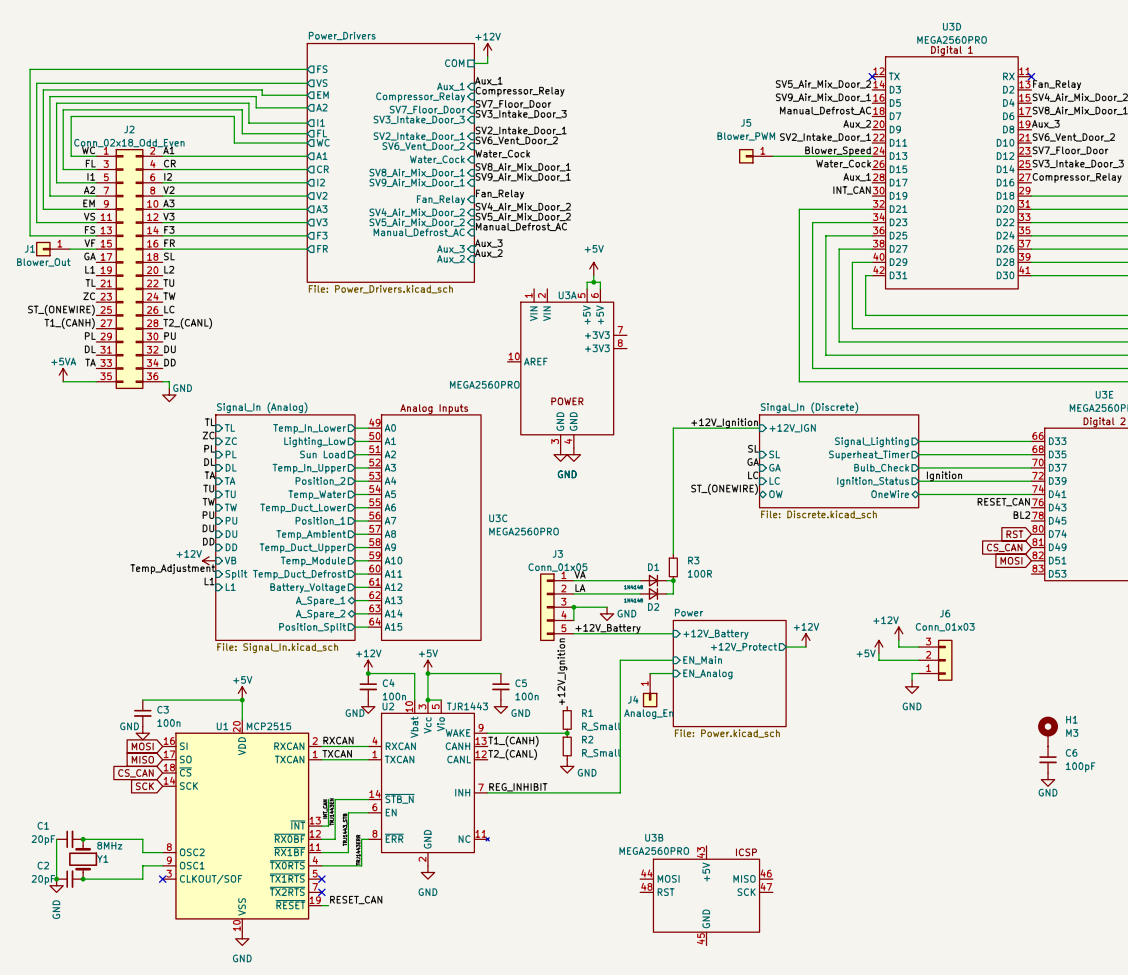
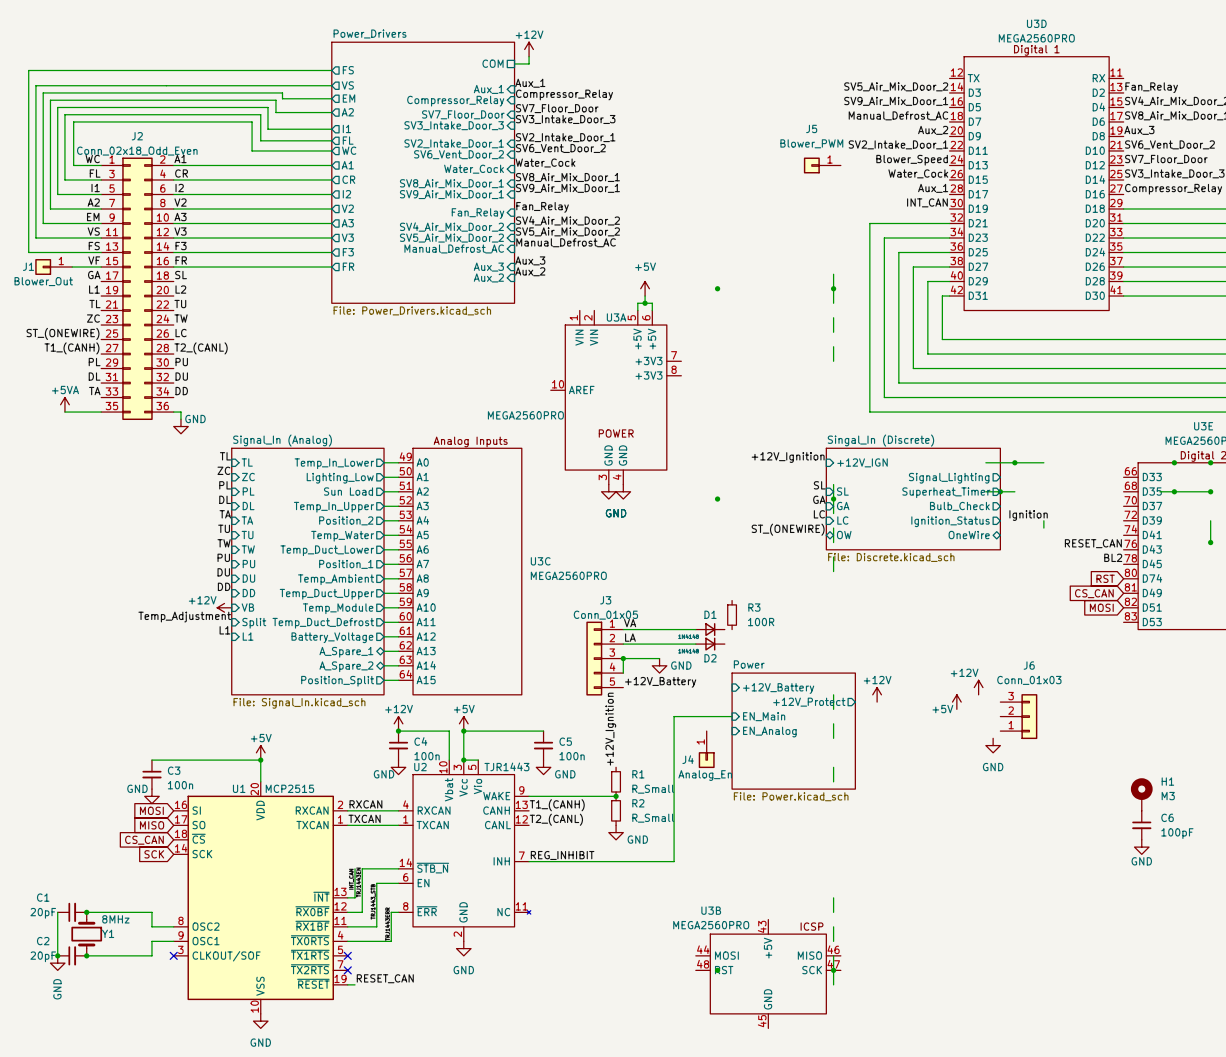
no-connect mark: (872, 76) -> none
no-connect mark: (1031, 76) -> none
wire: (772, 156) (872, 156) -> none
wire: none -> (833, 274) (833, 303)
junction: none -> (717, 288)
junction: none -> (833, 288)
wire: none -> (833, 317) (833, 332)
wire: none -> (833, 346) (833, 361)
wire: (759, 428) (673, 428) (673, 554) -> none
wire: none -> (985, 462) (1043, 462)
junction: none -> (1014, 462)
junction: none -> (1174, 462)
junction: none -> (1210, 462)
wire: (918, 441) (1031, 441) -> none
wire: none -> (833, 484) (833, 513)
wire: none -> (985, 491) (1000, 491)
junction: none -> (1000, 491)
wire: (931, 454) (1031, 454) -> none
wire: none -> (1159, 491) (1210, 491)
junction: none -> (1174, 491)
junction: none -> (1210, 491)
junction: none -> (717, 499)
junction: none -> (833, 499)
wire: (918, 467) (1031, 467) -> none
wire: (918, 481) (1031, 481) -> none
wire: none -> (1043, 520) (1043, 528)
wire: none -> (1210, 520) (1210, 542)
wire: none -> (833, 528) (833, 542)
wire: (918, 494) (1031, 494) -> none
junction: none -> (1210, 542)
wire: none -> (833, 557) (833, 571)
wire: (666, 580) (673, 580) (673, 593) (666, 593) -> none
junction: (673, 580) -> none
wire: (573, 633) (673, 633) -> none
wire: none -> (833, 694) (833, 709)
wire: (898, 640) (898, 647) (918, 647) -> none
wire: (786, 647) (805, 647) -> none
wire: (878, 653) (878, 660) (918, 660) -> none
wire: none -> (833, 723) (833, 738)
wire: (650, 673) (673, 673) -> none
wire: (918, 673) (912, 673) (912, 680) -> none
wire: none -> (833, 767) (833, 781)
wire: none -> (833, 897) (833, 912)
wire: none -> (833, 926) (833, 941)
wire: none -> (833, 955) (833, 984)
junction: none -> (717, 970)
junction: none -> (833, 970)

